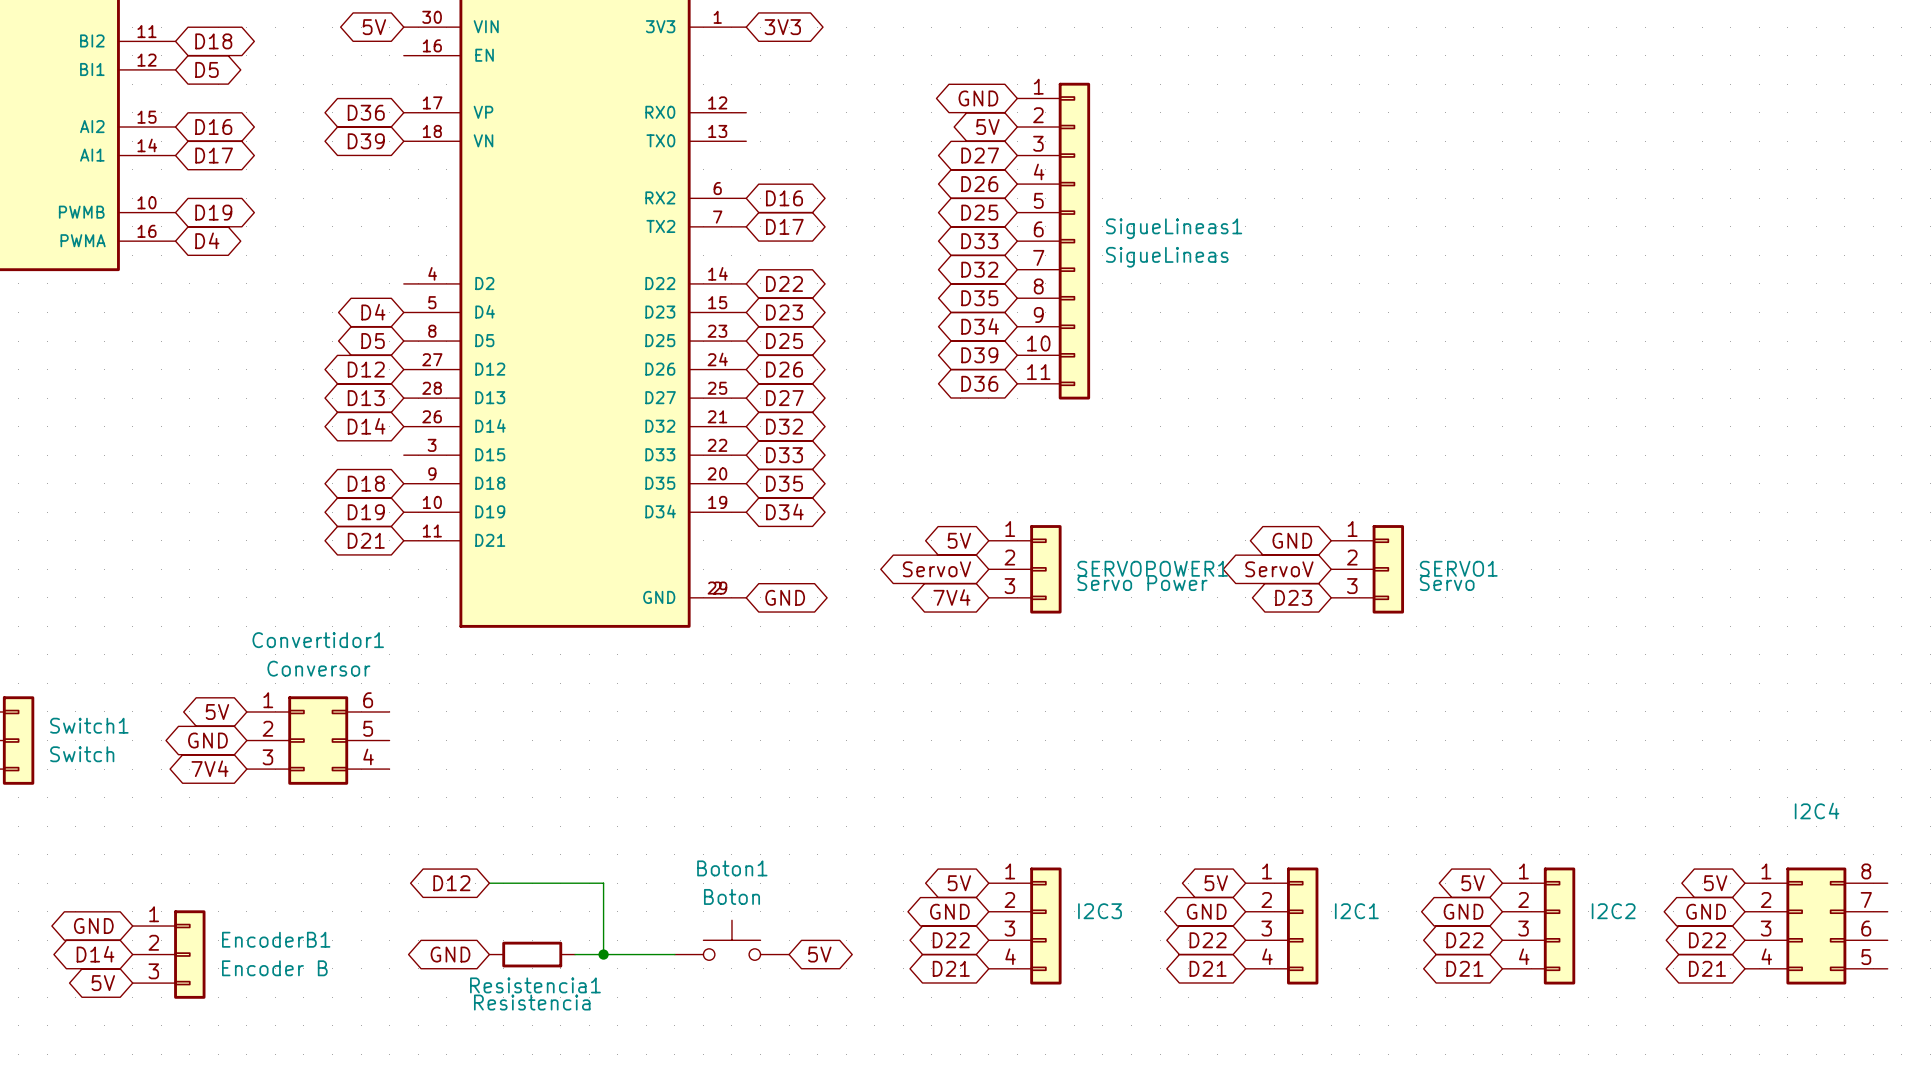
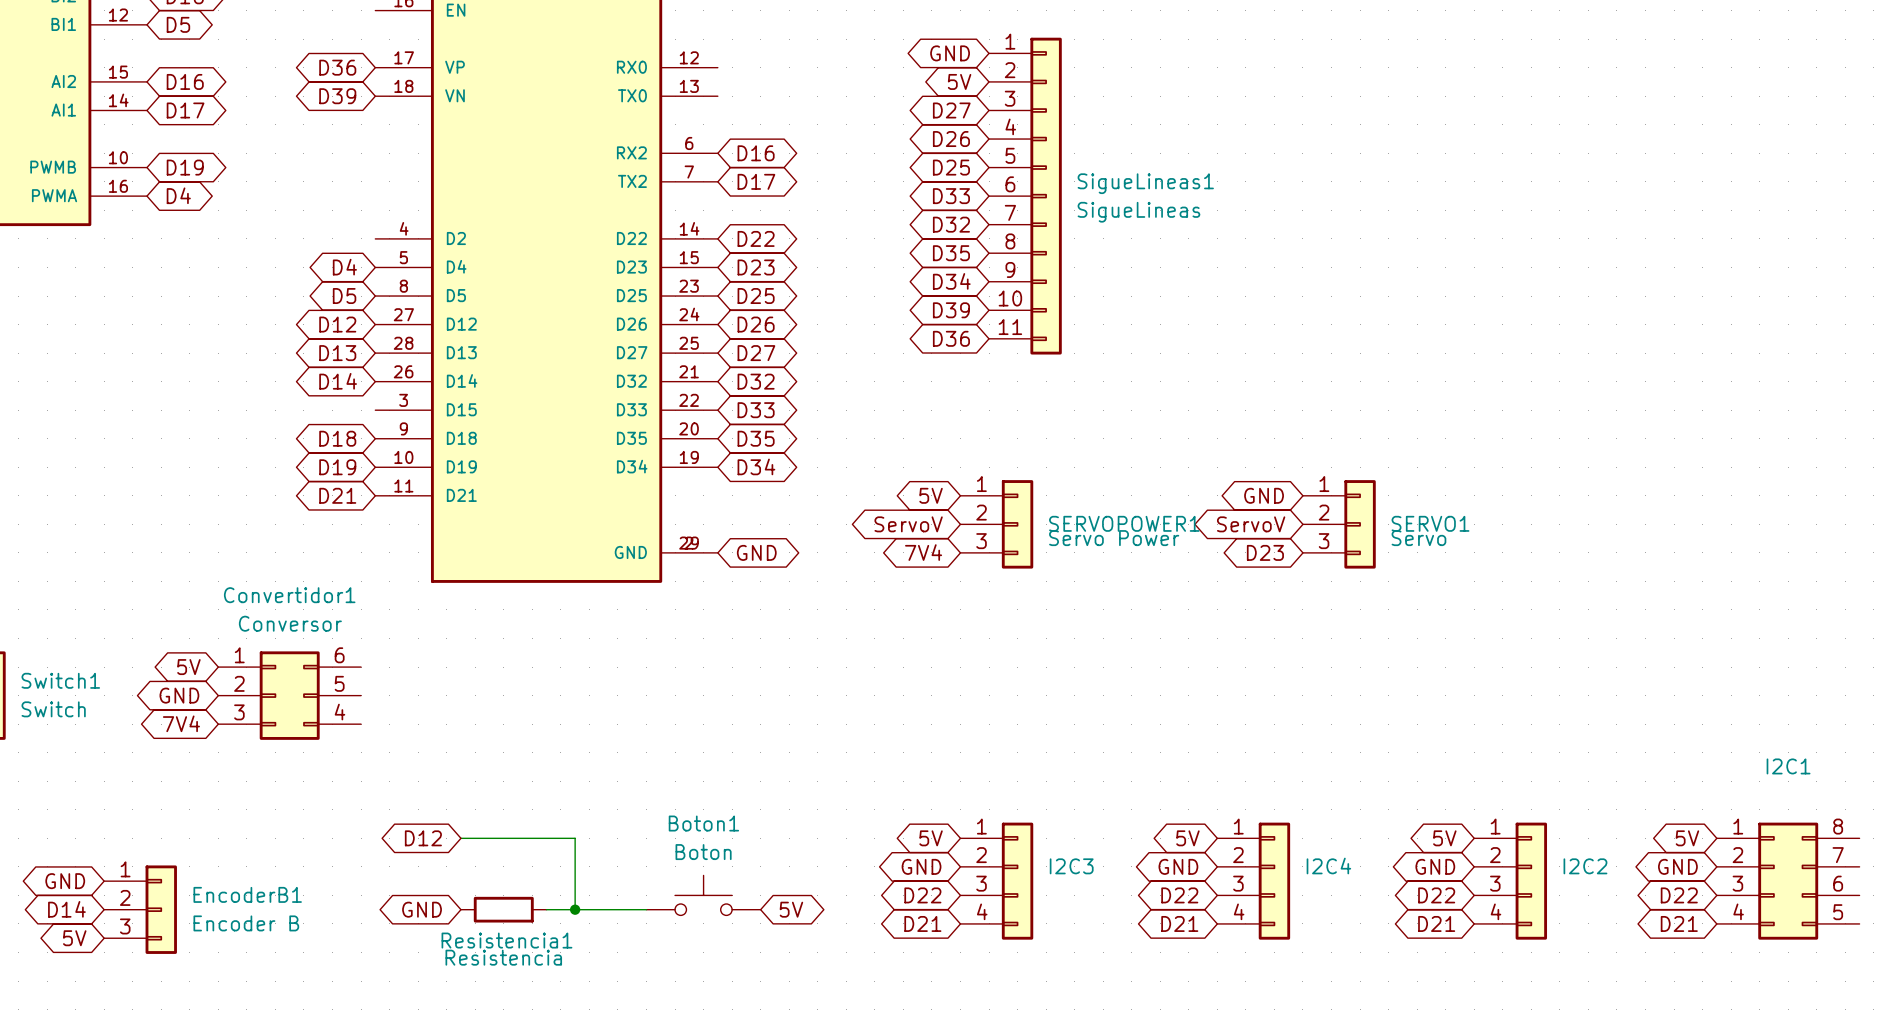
I2C4 name: I2C4 (1817, 811) -> I2C1 (1788, 766)
I2C1 name: I2C1 (1356, 911) -> I2C4 (1328, 866)

